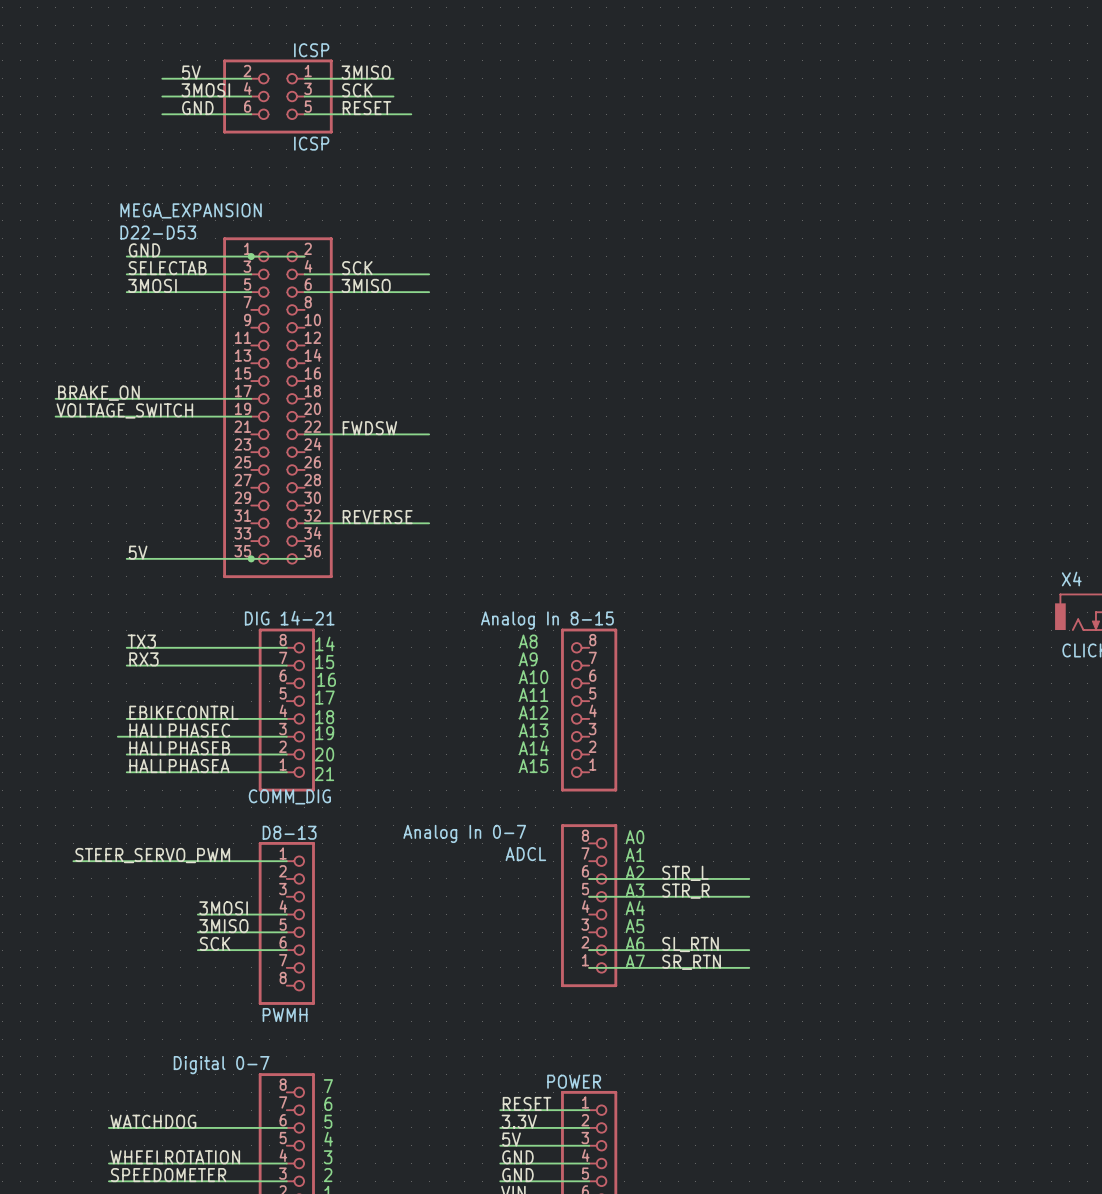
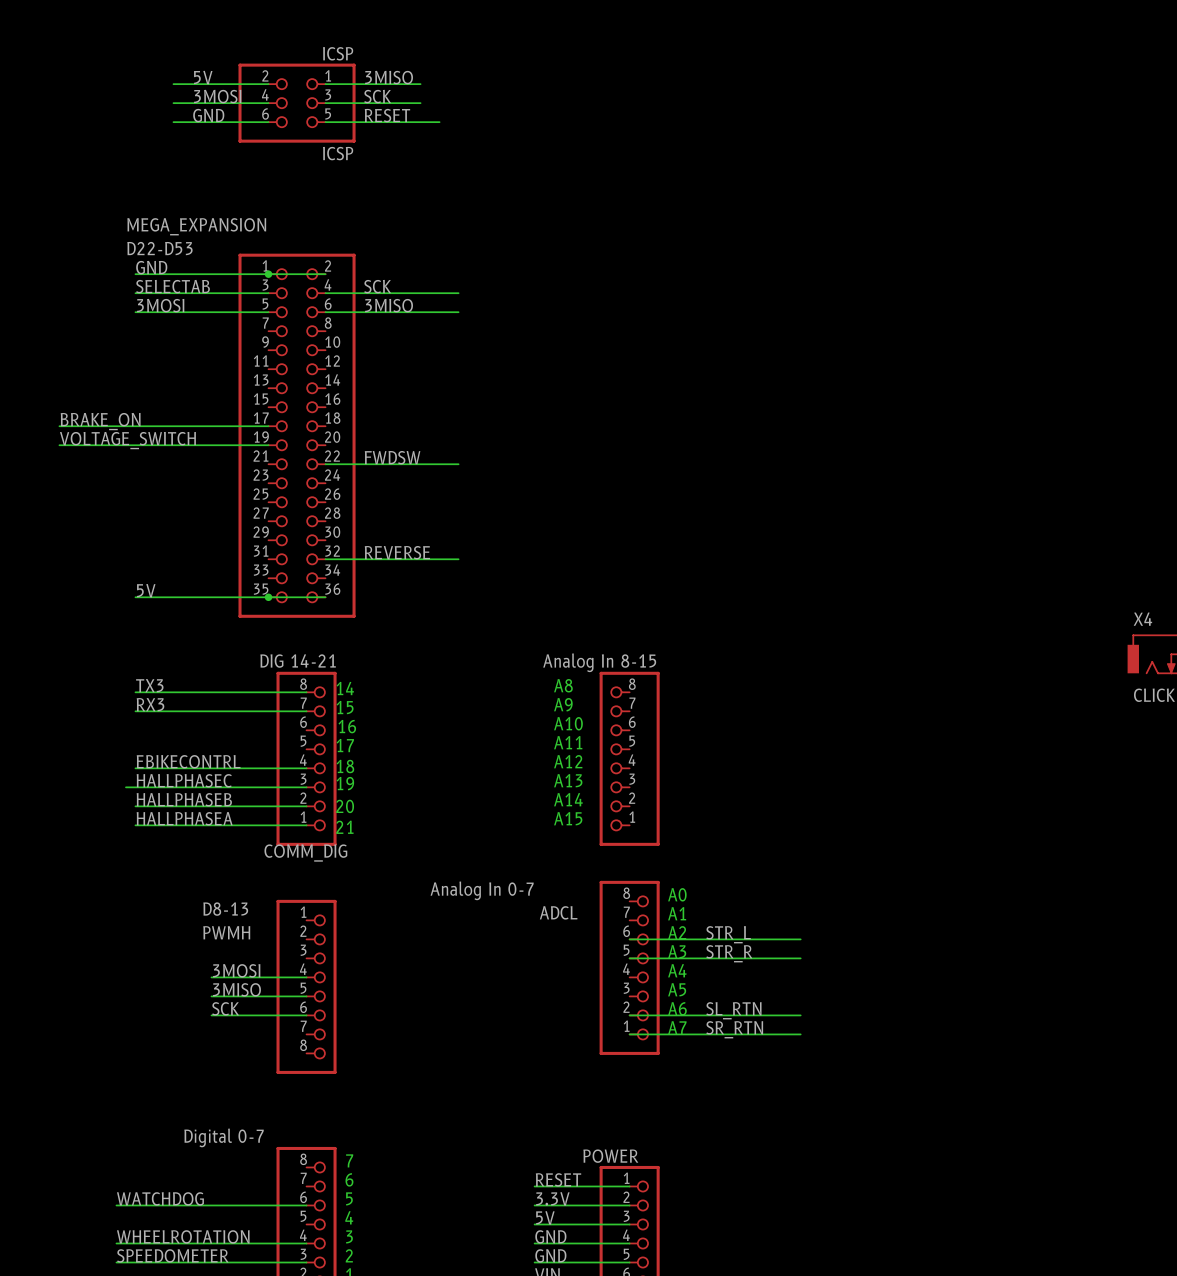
D8-13 name position: D8-13 (289, 832) -> D8-13 (225, 909)
label: STEER_SERVO_PWM (152, 855) -> none
wire: (73, 861) (286, 861) -> none
D8-13 value position: PWMH (285, 1015) -> PWMH (226, 932)

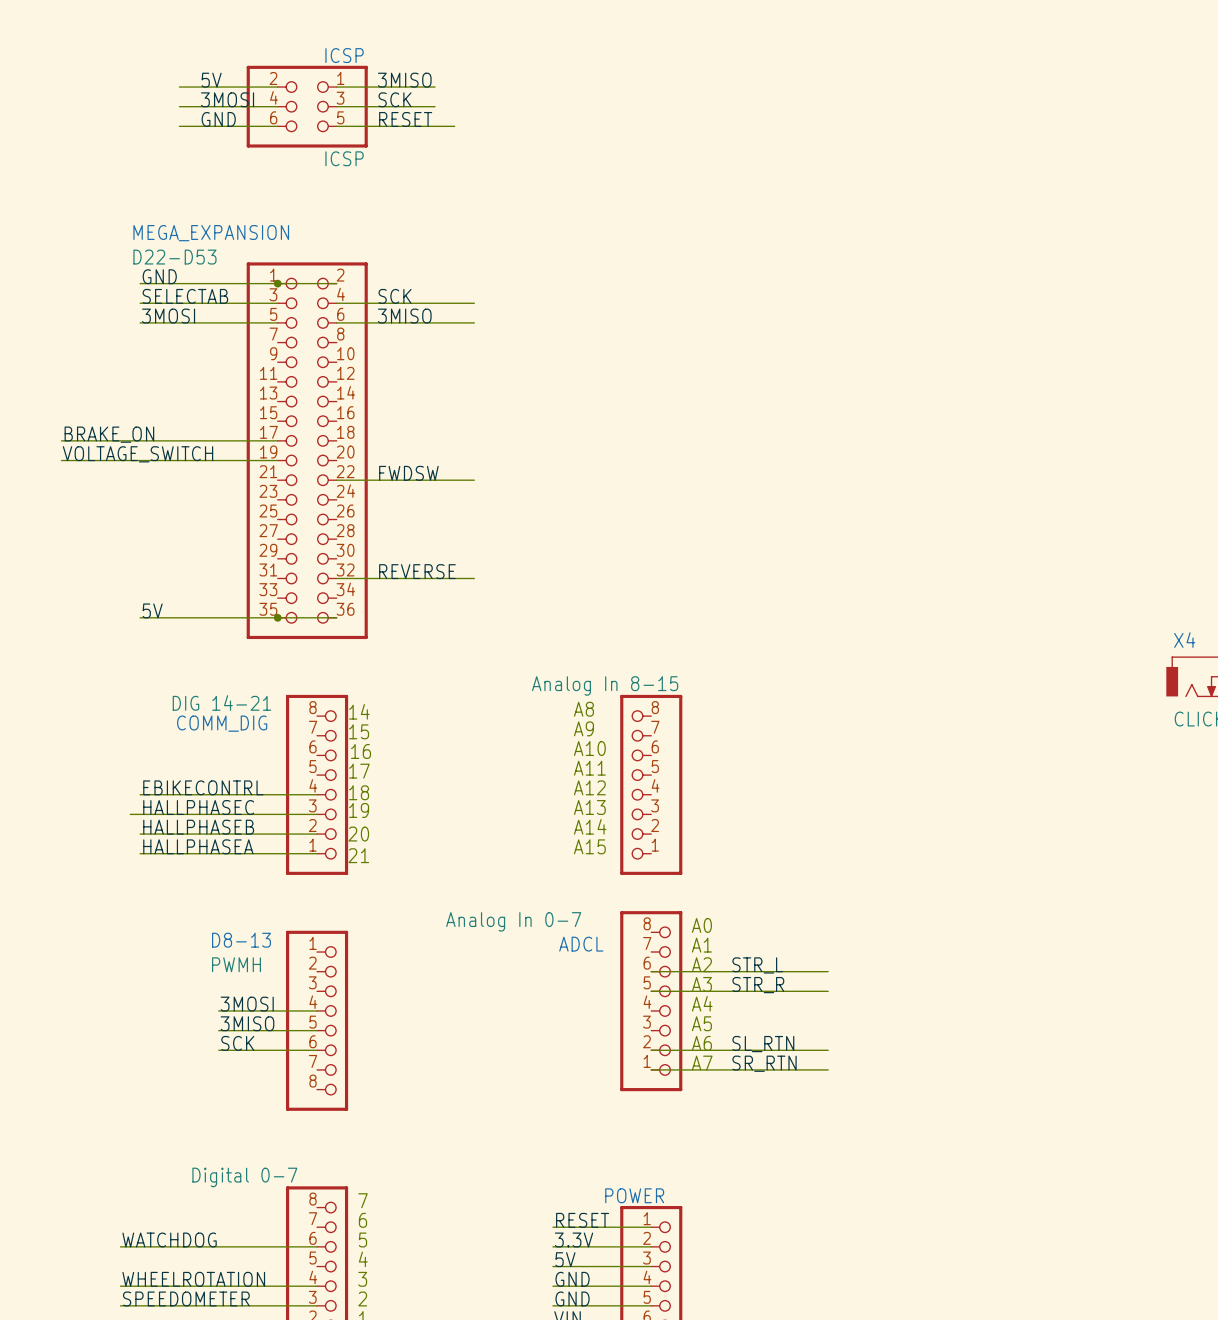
COMM_DIG value position: DIG 14-21 (298, 661) -> DIG 14-21 (221, 702)
label: TX3 (149, 685) -> none
wire: (135, 692) (306, 692) -> none
label: RX3 (150, 704) -> none
wire: (135, 711) (306, 711) -> none
COMM_DIG name position: COMM_DIG (305, 853) -> COMM_DIG (222, 723)

